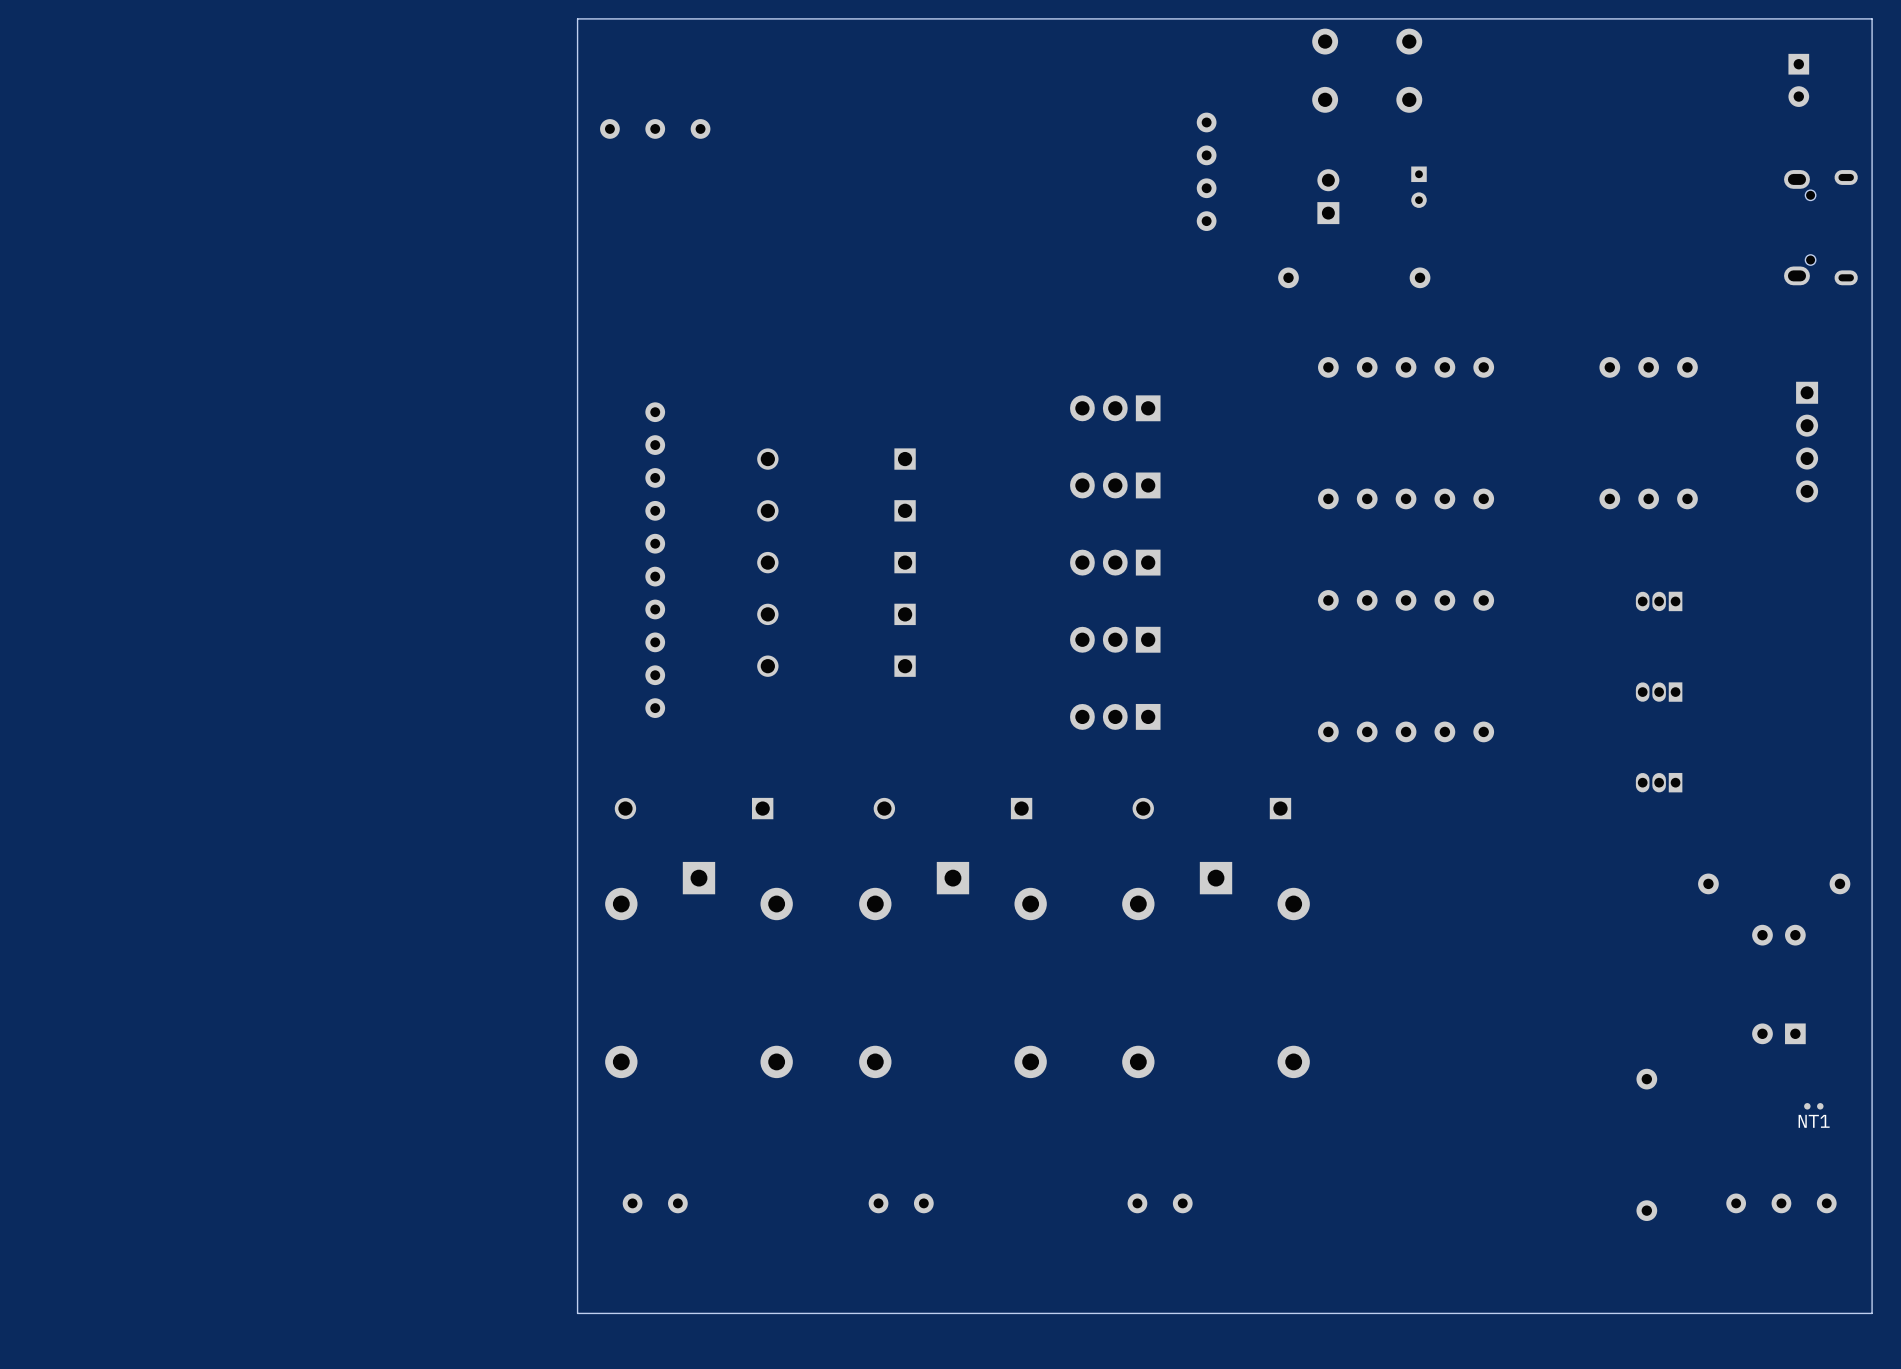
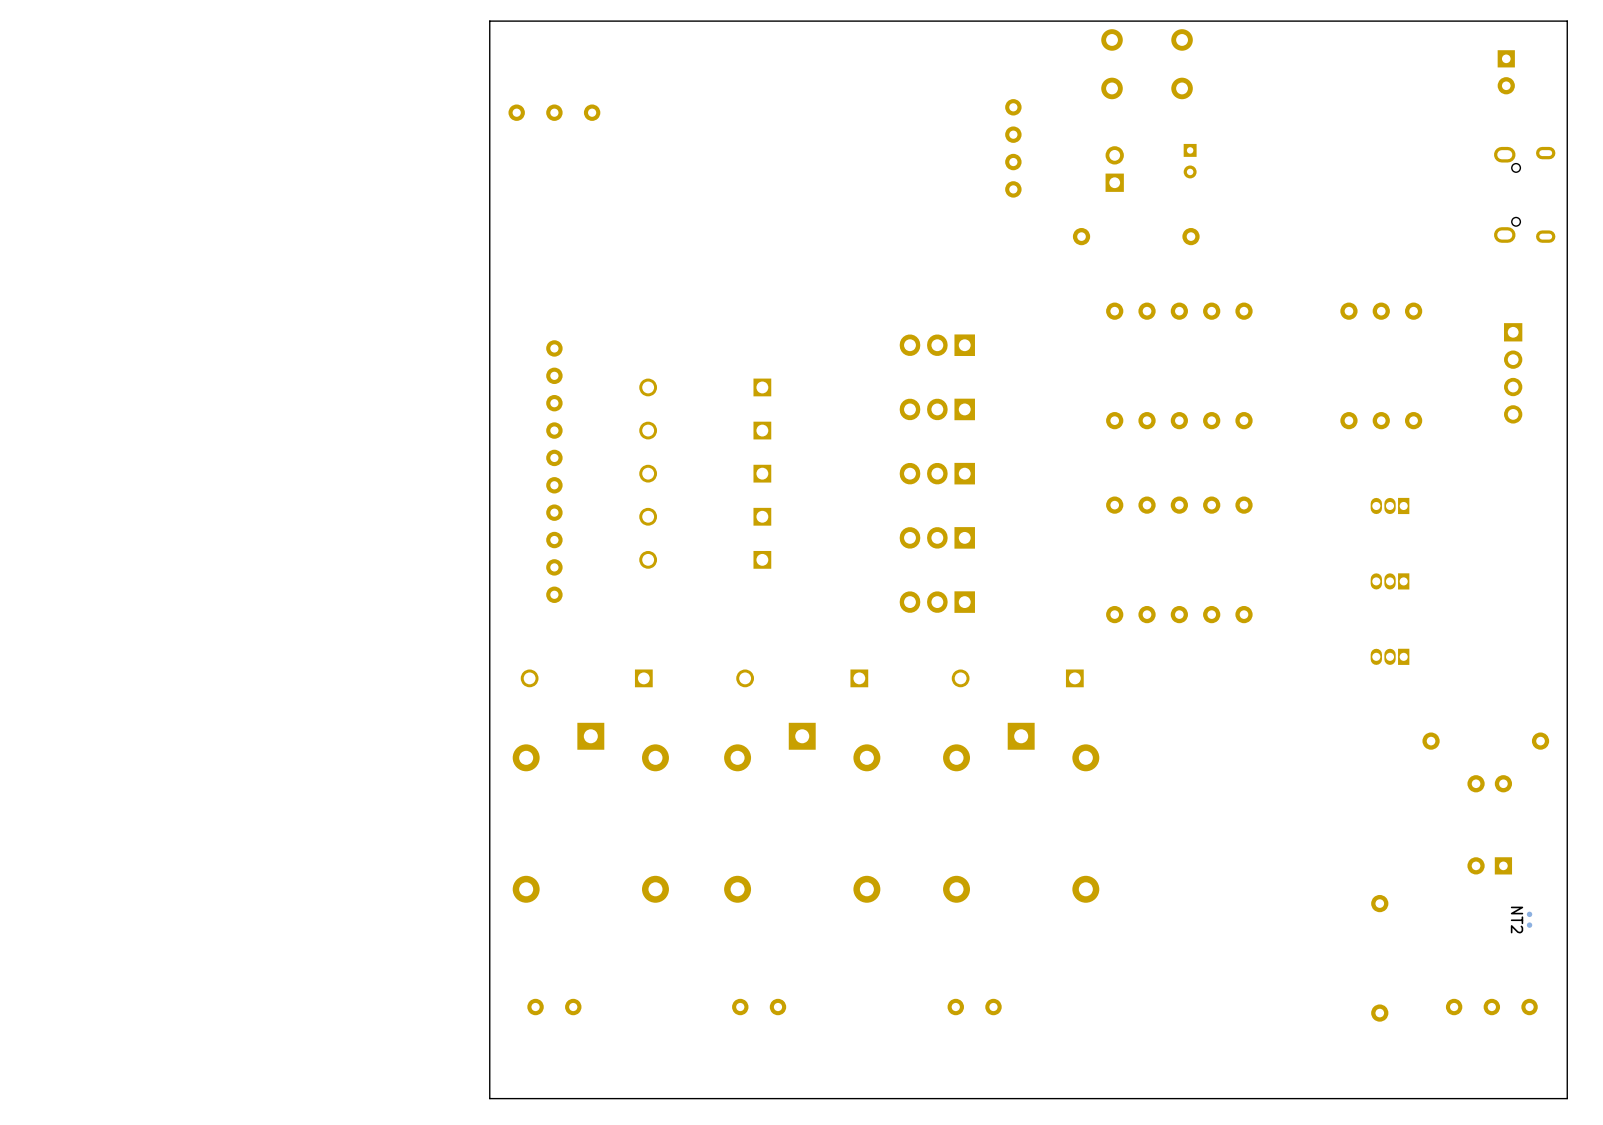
NT2: none -> (1529, 919)
NT1: (1813, 1106) -> none

